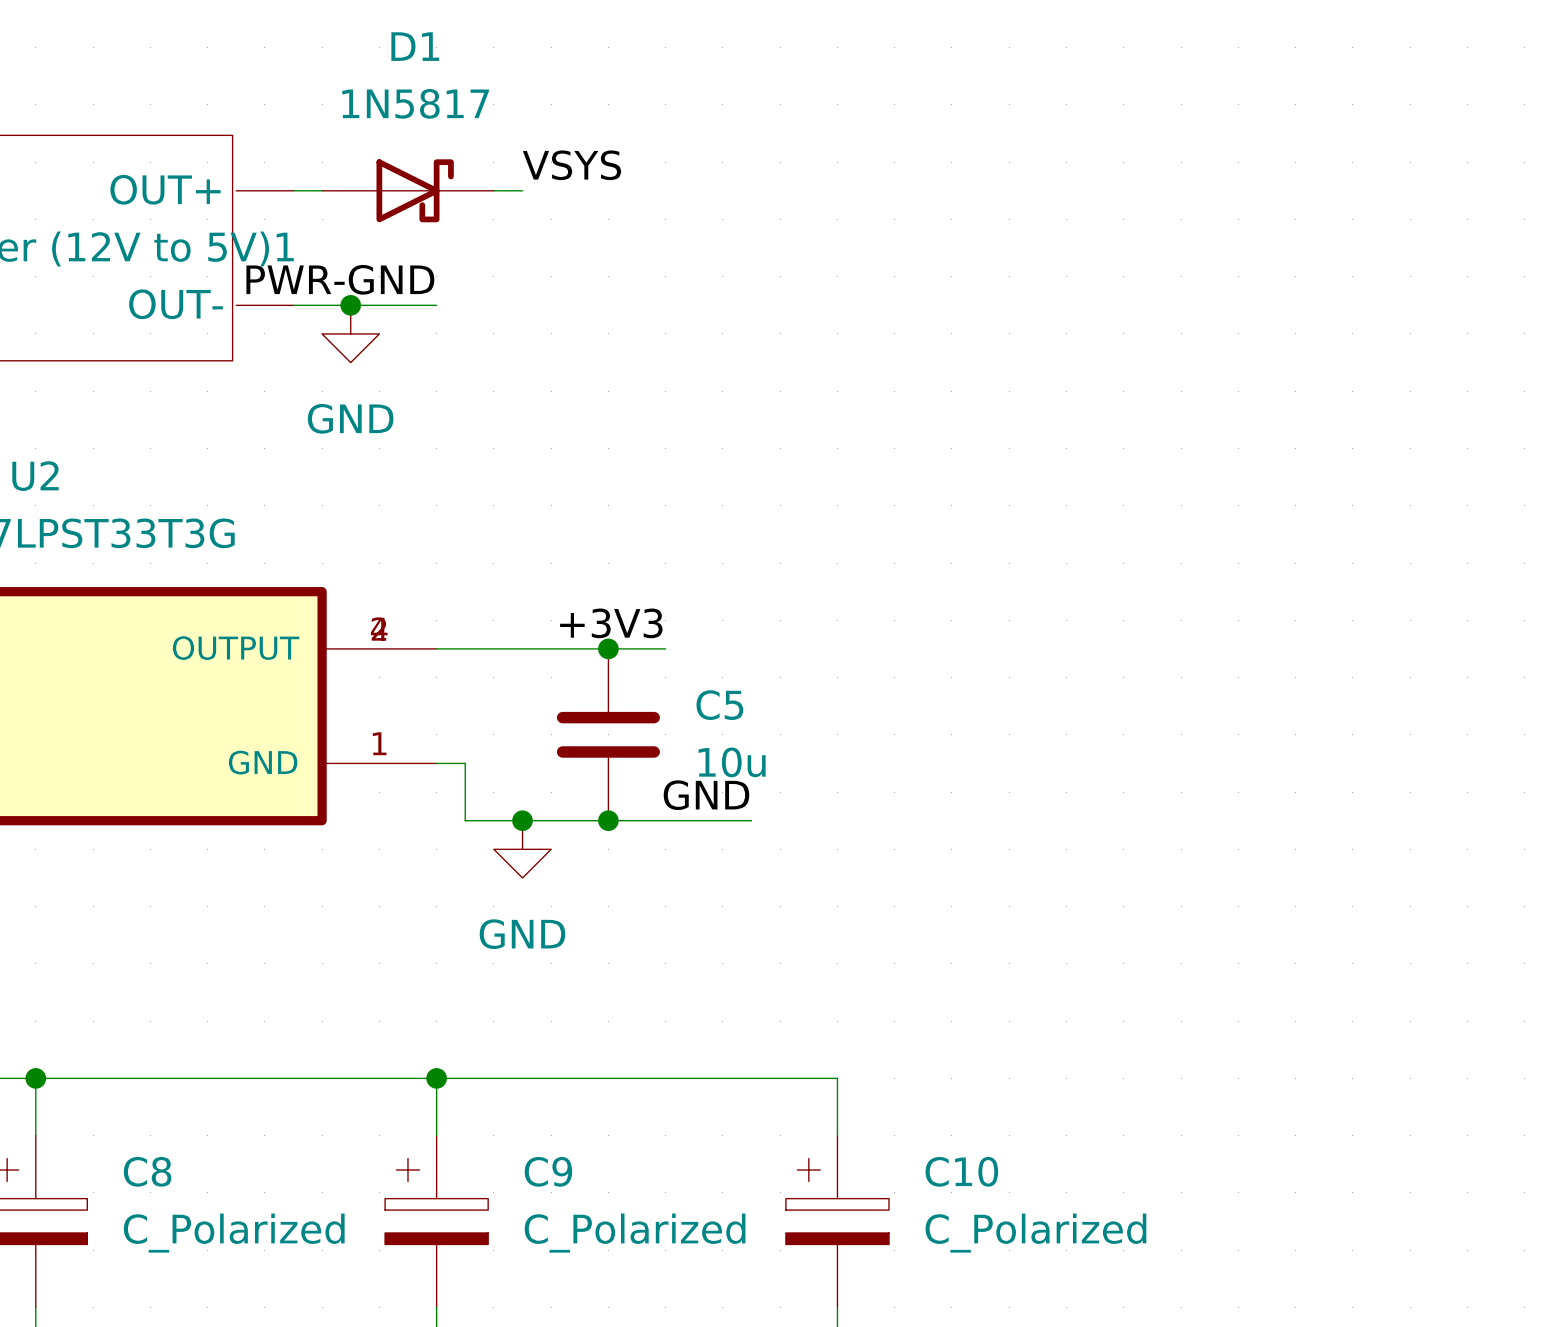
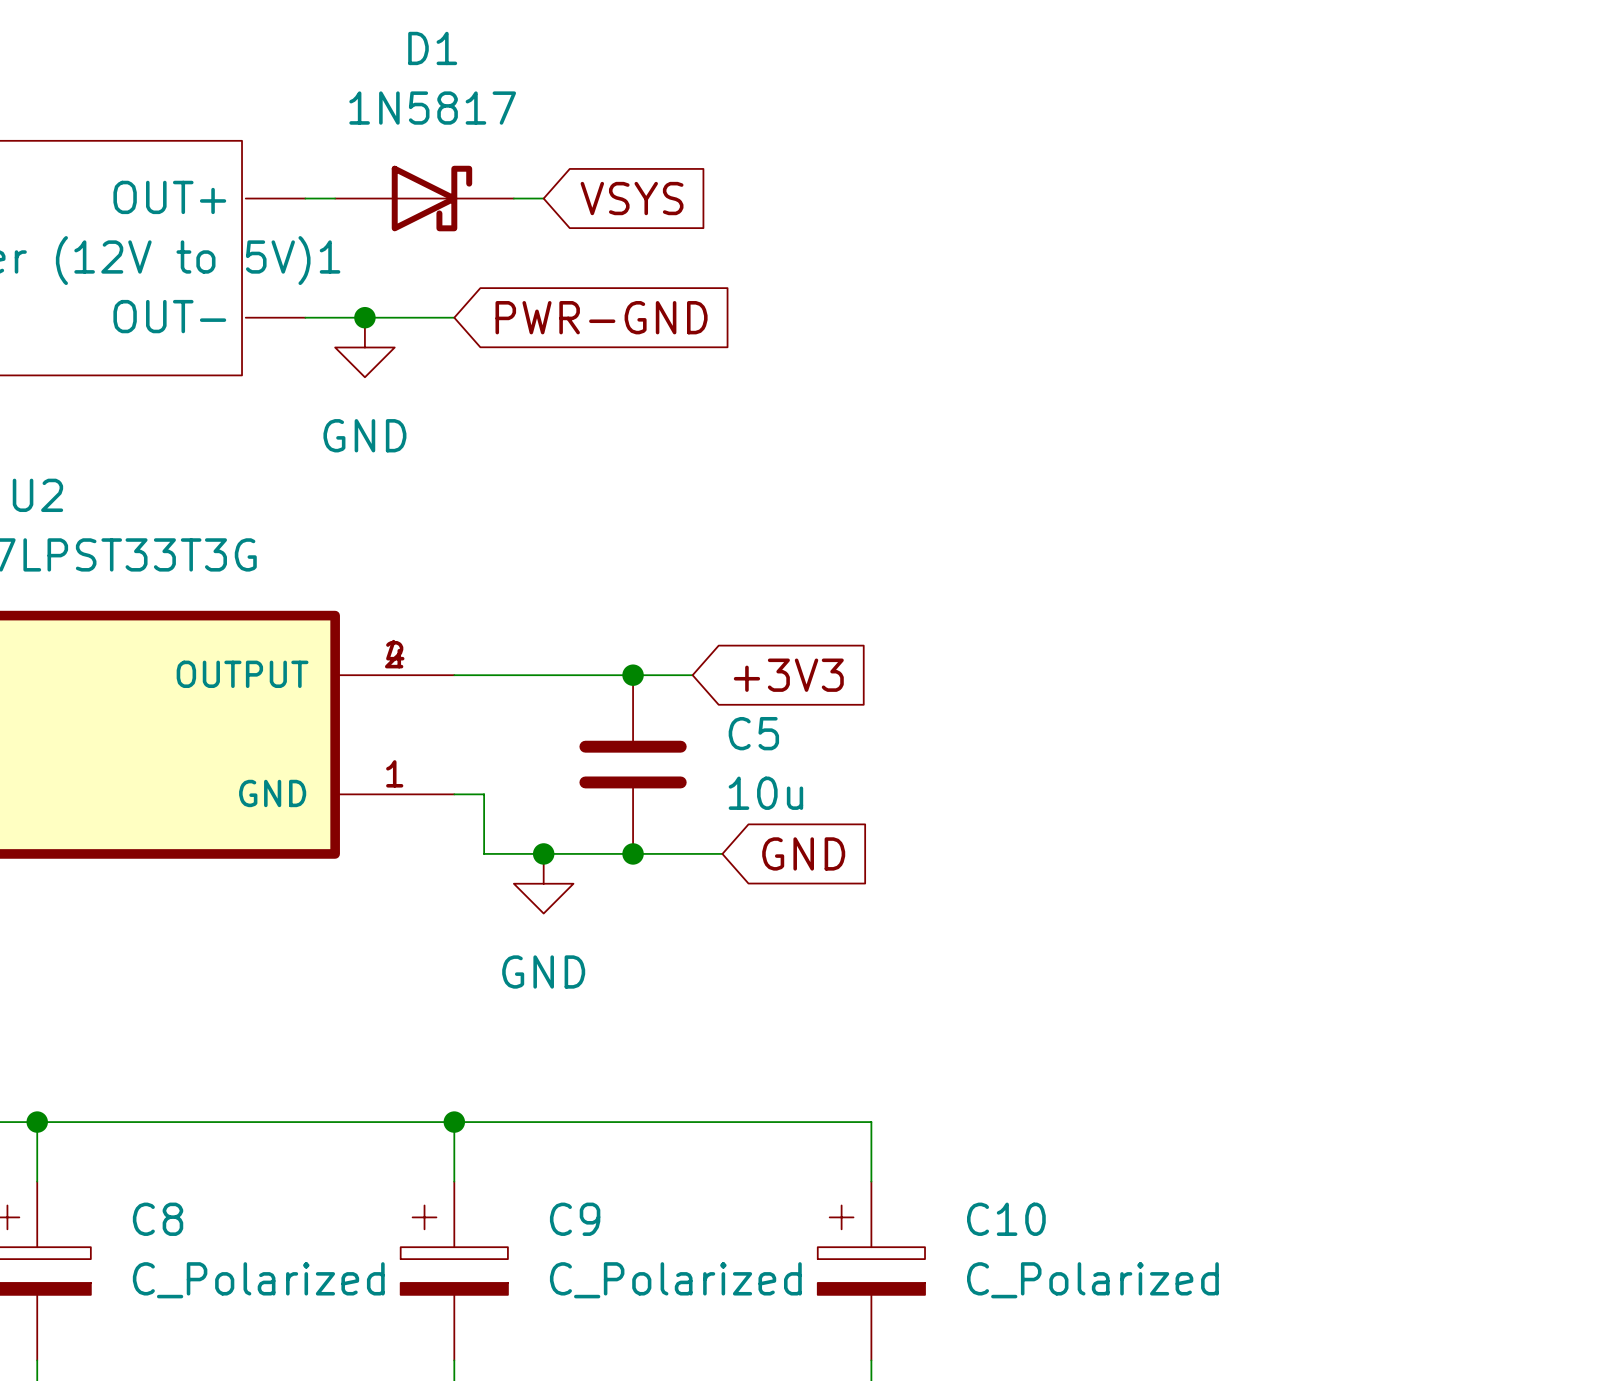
label: VSYS (571, 165) -> none
global label: none -> VSYS (632, 198)
label: PWR-GND (340, 279) -> none
global label: none -> PWR-GND (601, 317)
label: +3V3 (611, 623) -> none
global label: none -> +3V3 (788, 675)
label: GND (706, 795) -> none
wire: (694, 820) (751, 820) -> none
global label: none -> GND (803, 853)

